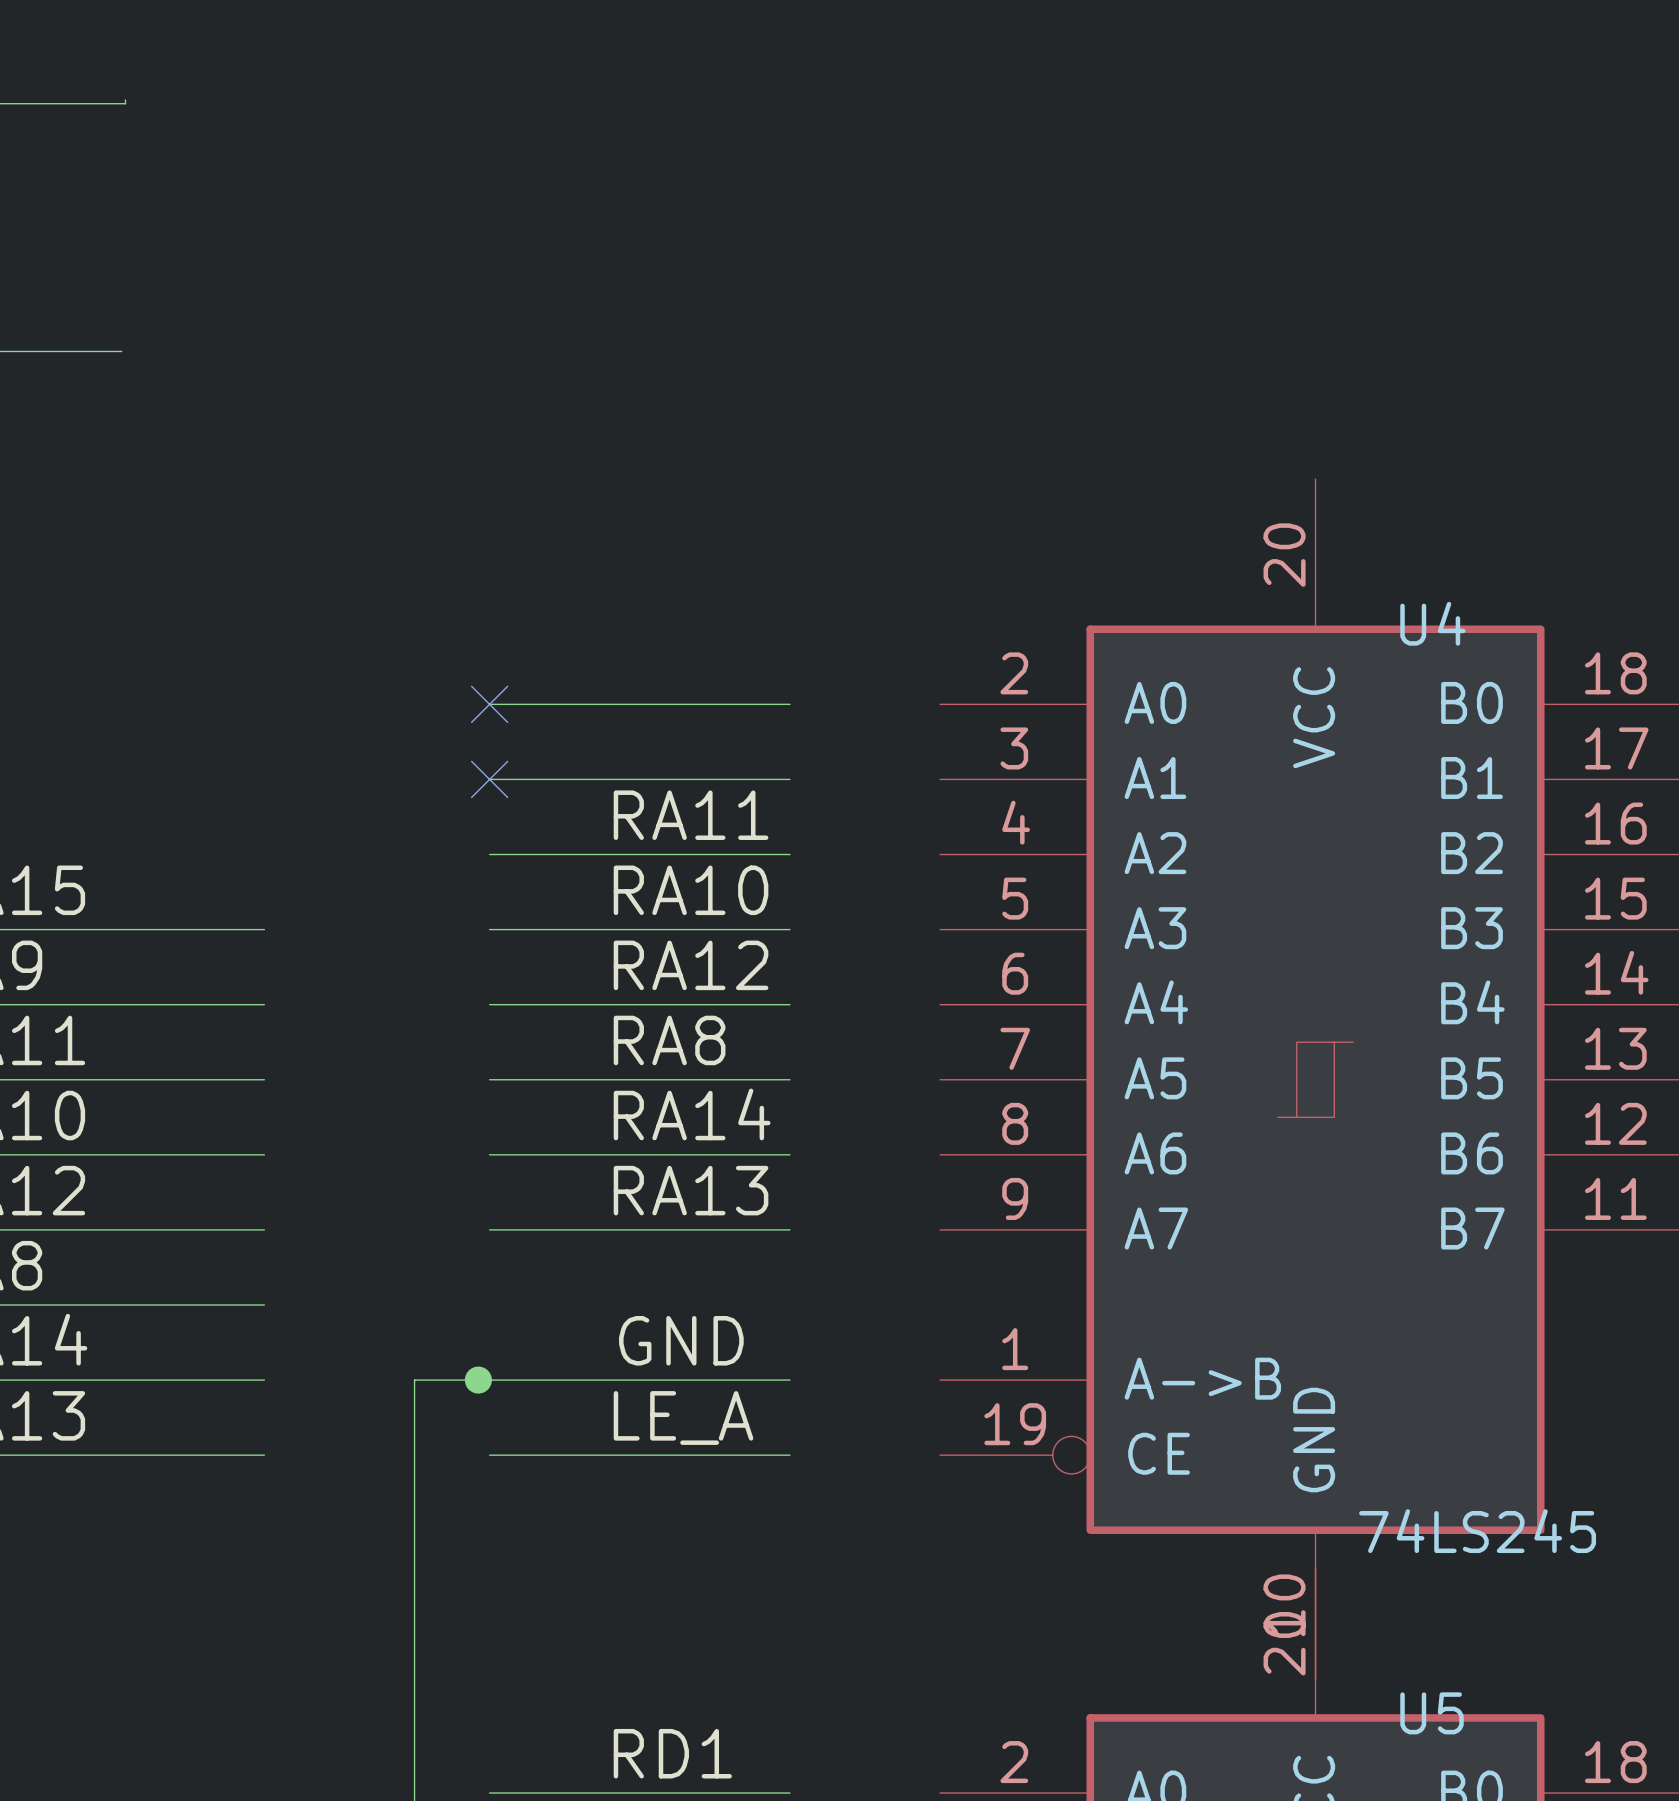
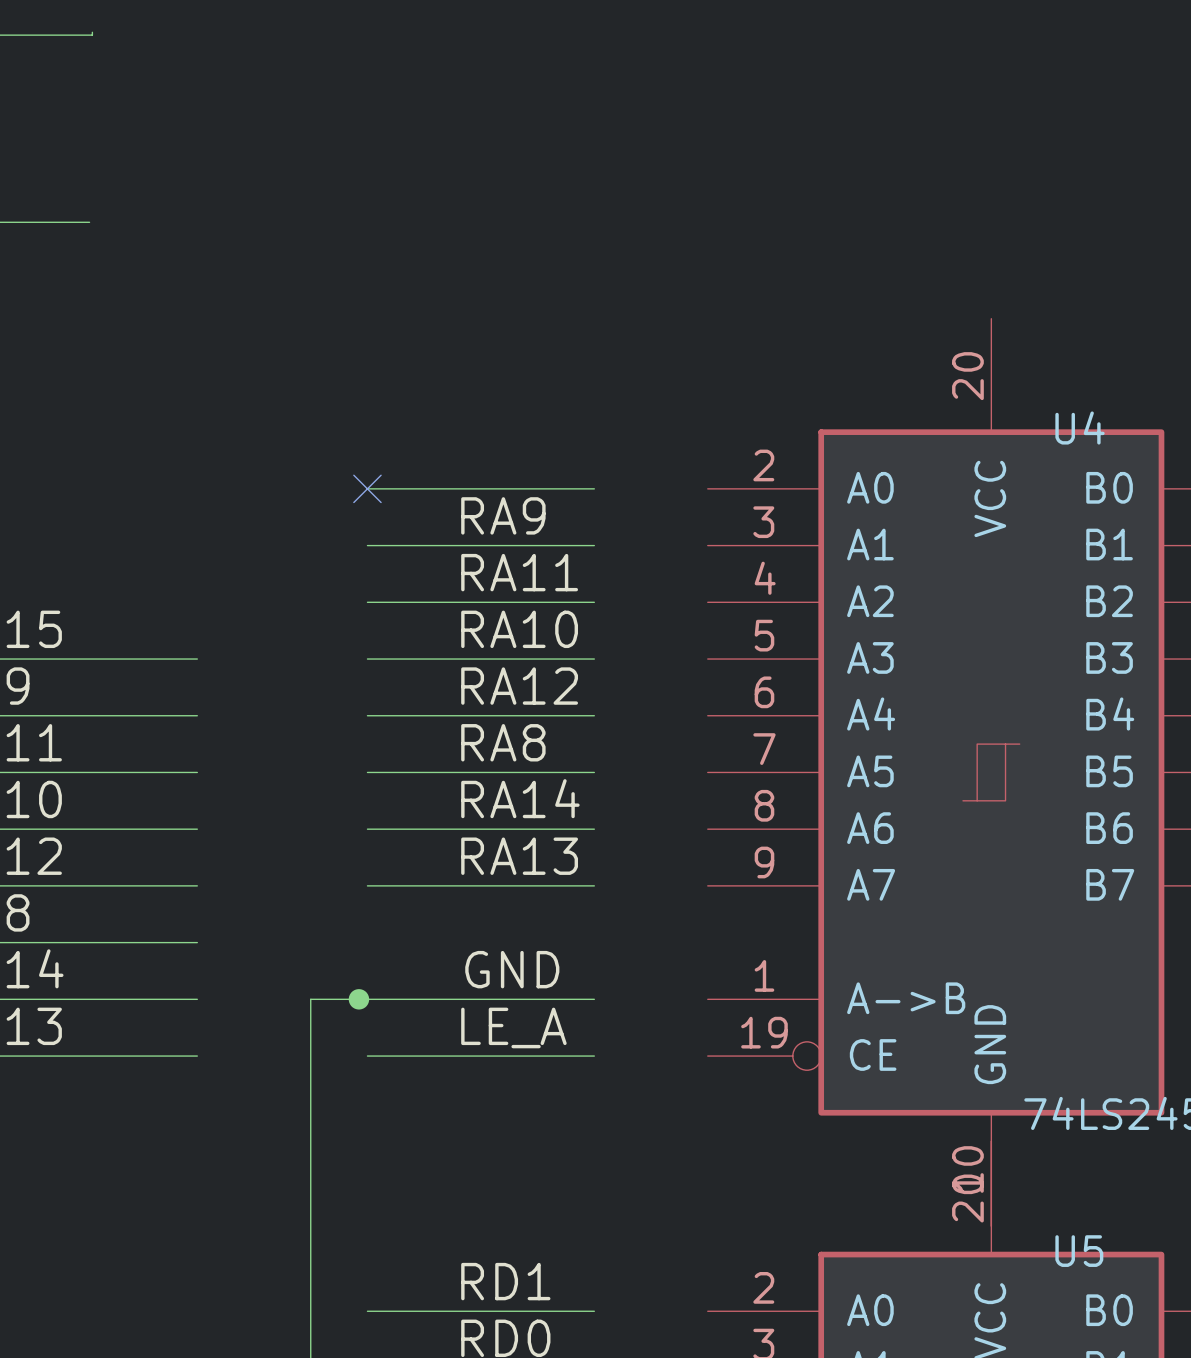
label: none -> RA9 (503, 515)
no-connect mark: (489, 779) -> none

